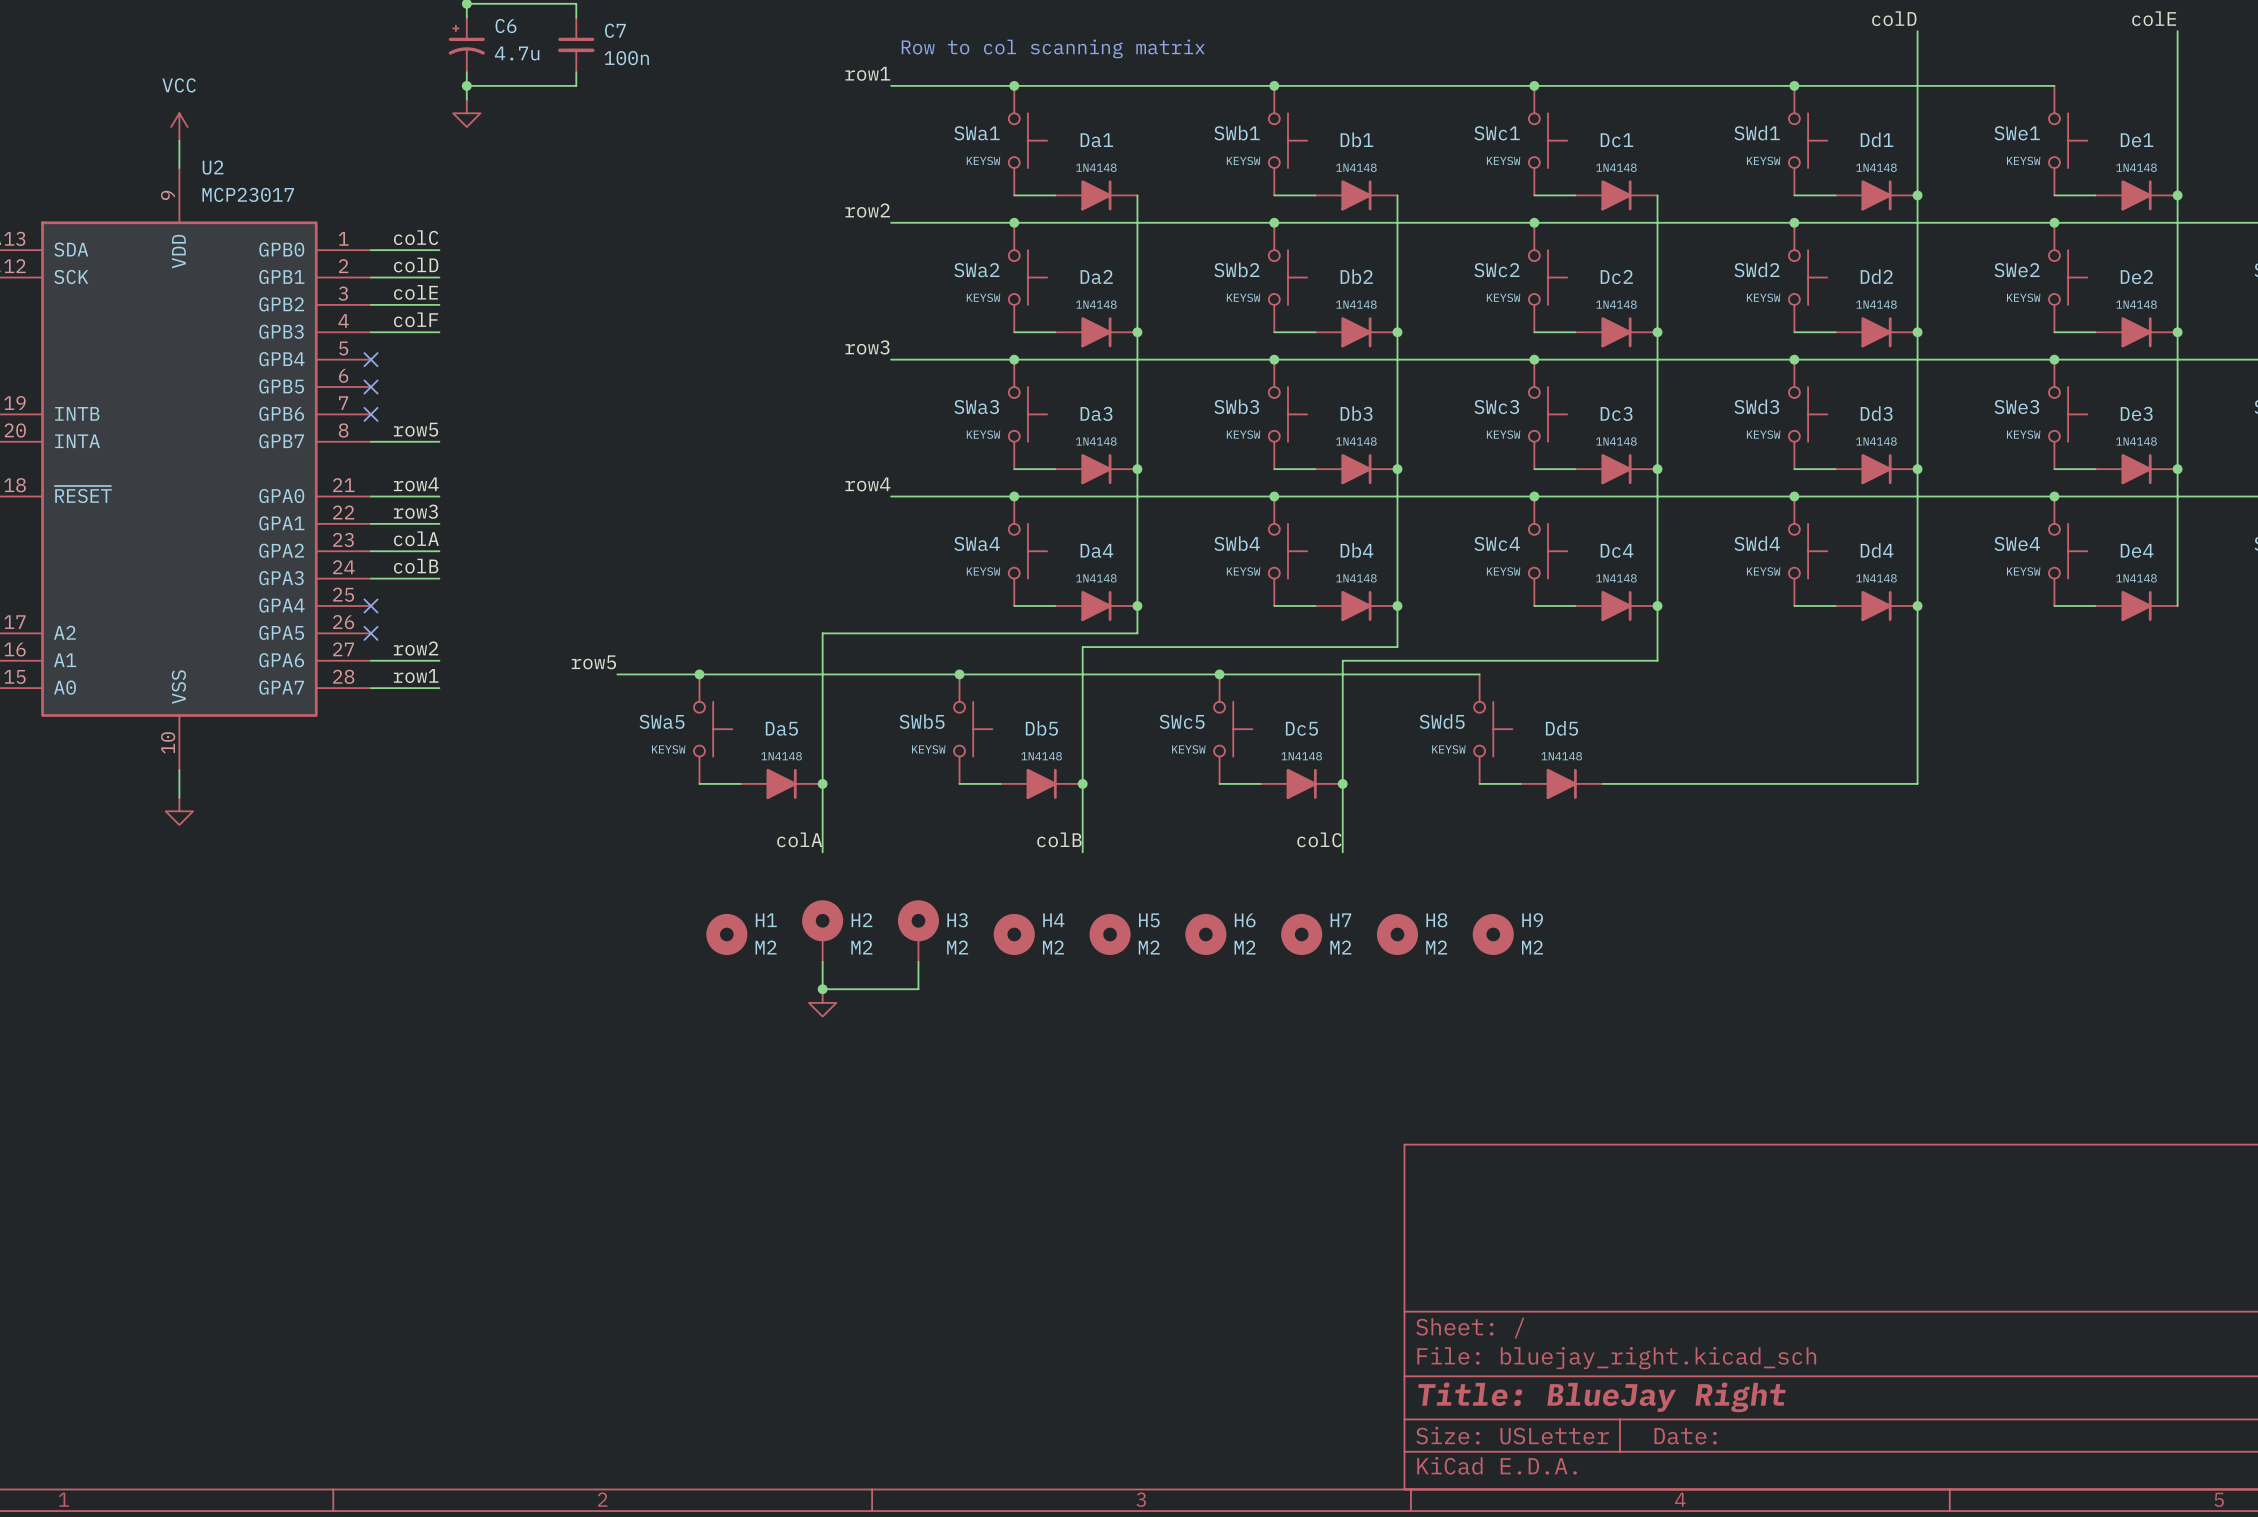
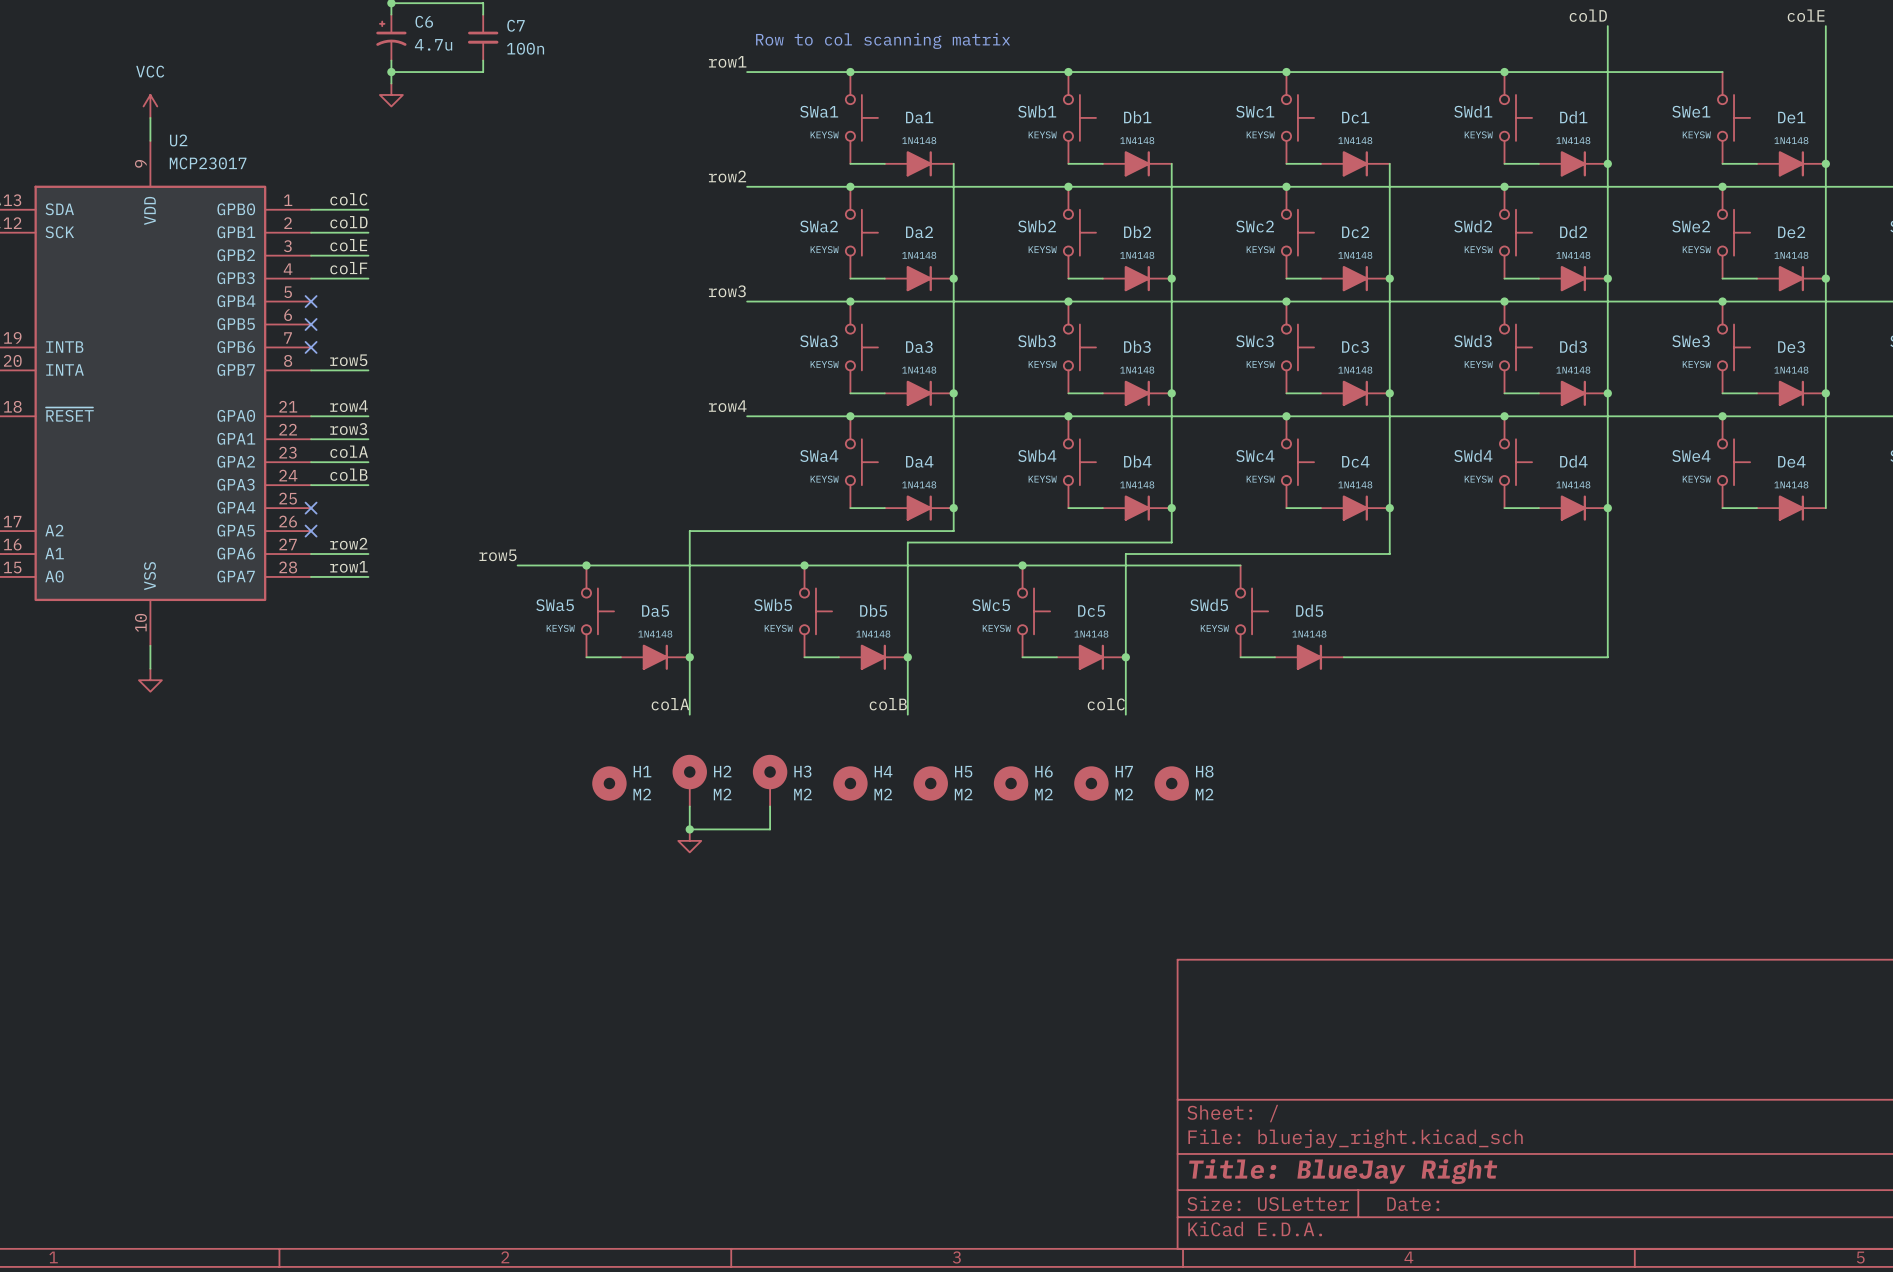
H9: M2 (1493, 934) -> none

